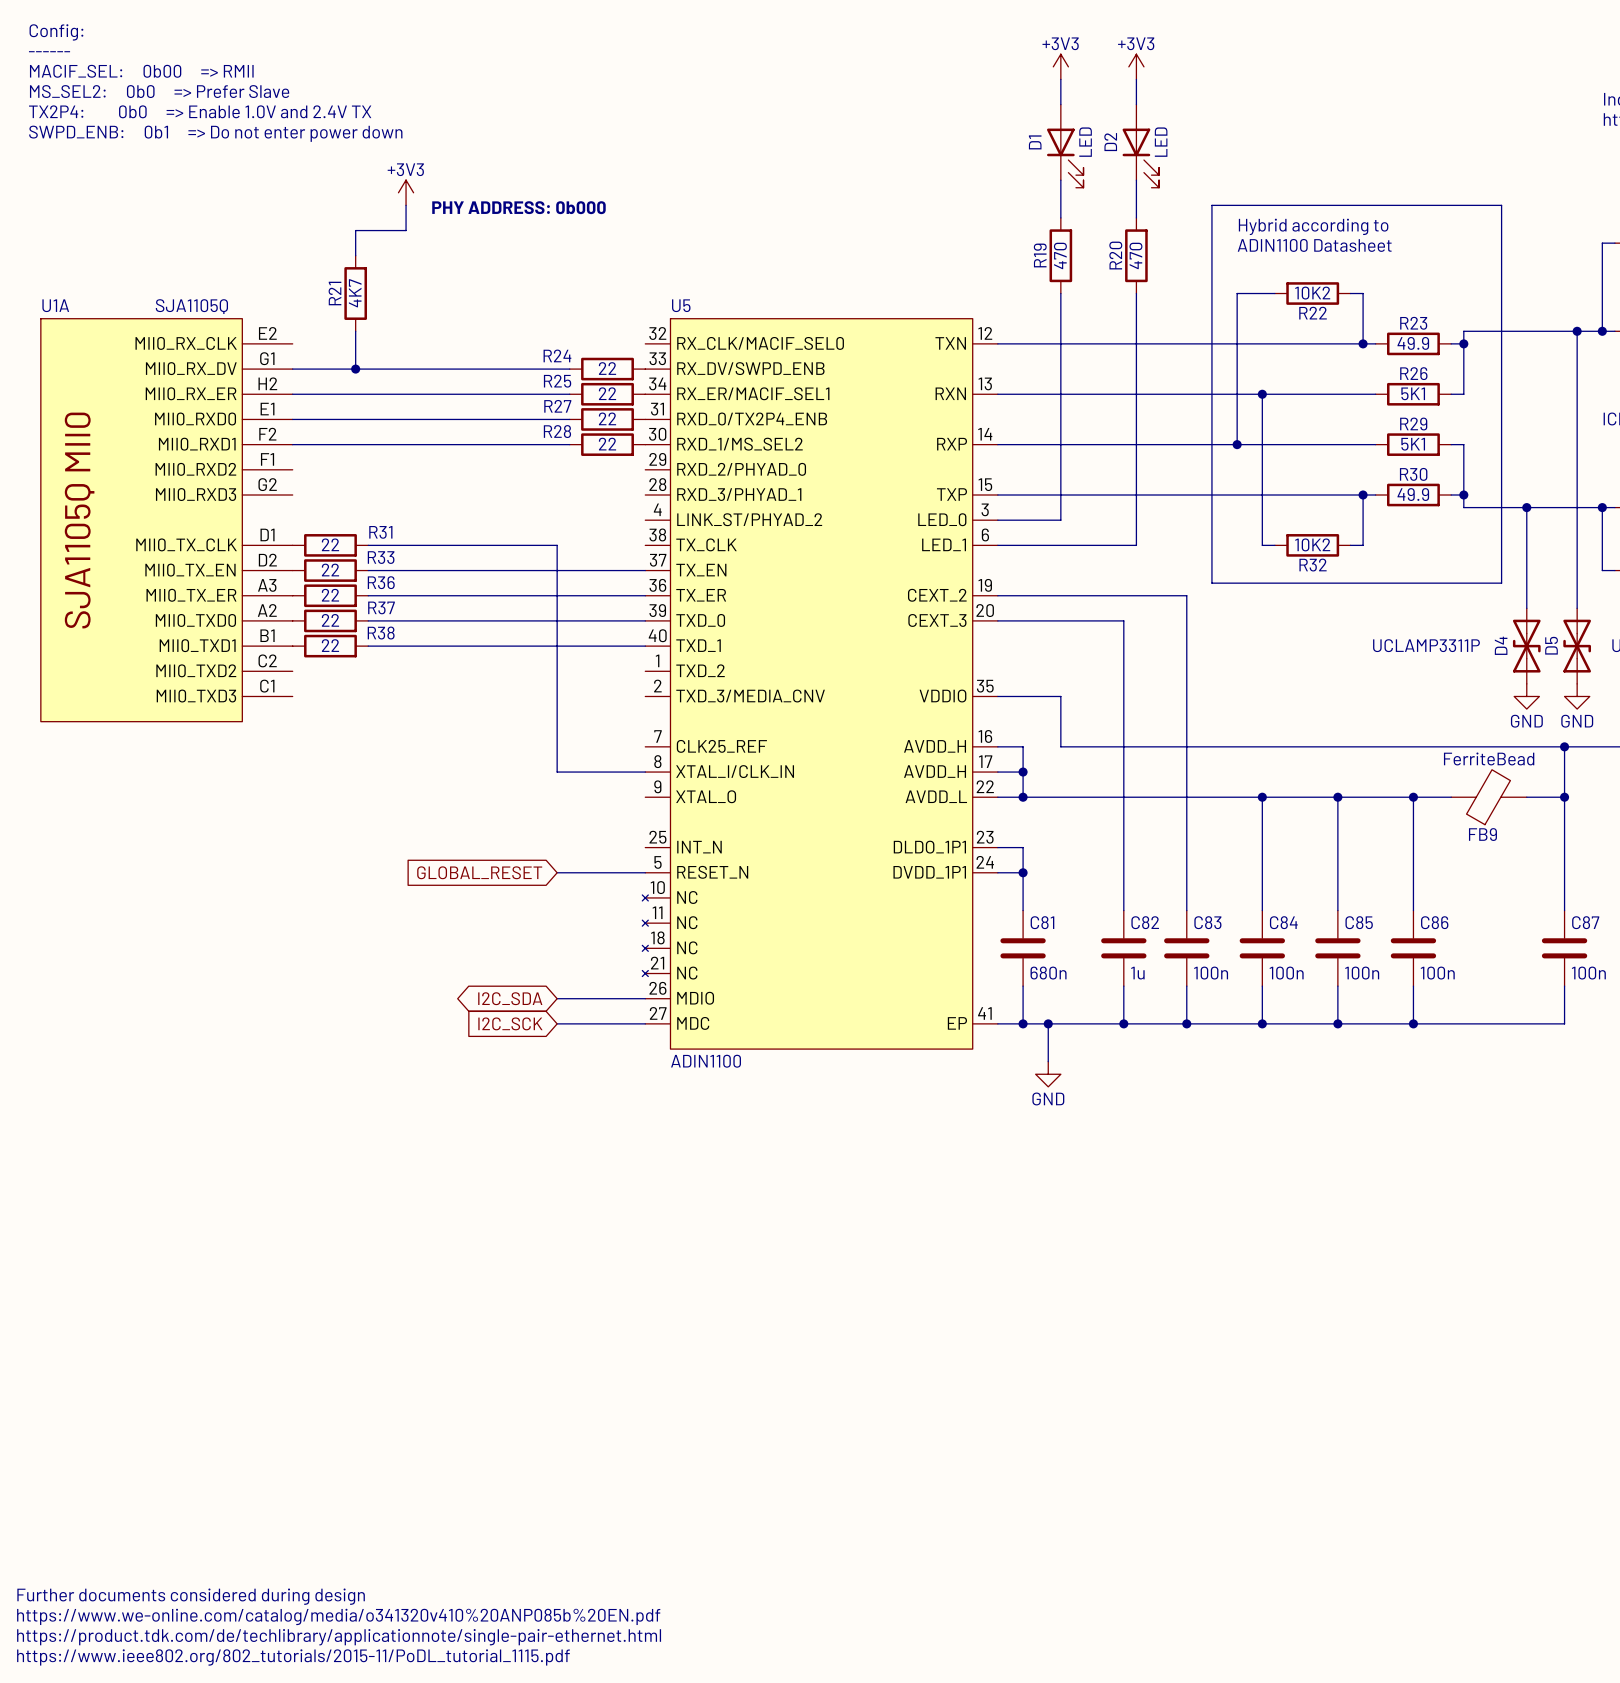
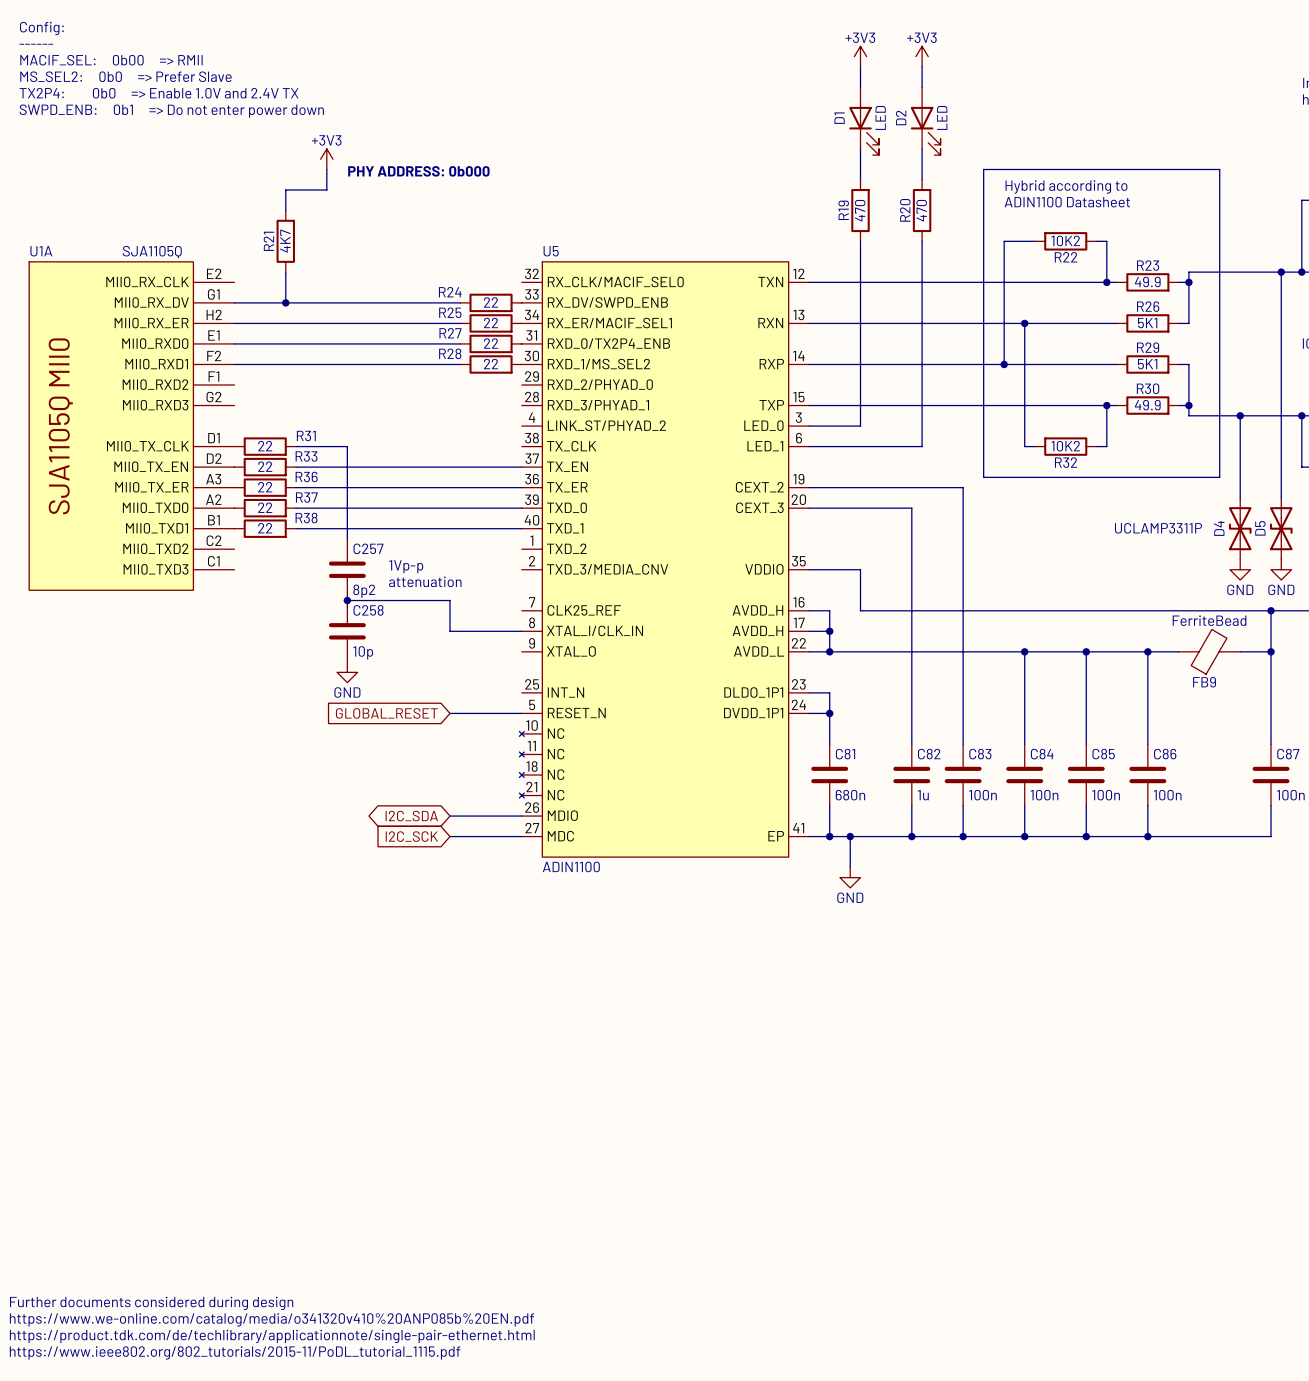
wire: (431, 545) (557, 545) (557, 734) -> (347, 446) (347, 538)
text: none -> 1Vp-p (406, 566)
C257: none -> 8p2 (347, 569)
text: none -> attenuation (425, 581)
wire: none -> (347, 600) (449, 600)
junction: none -> (347, 600)
C258: none -> 10p (347, 631)
power symbol: none -> GND (347, 672)

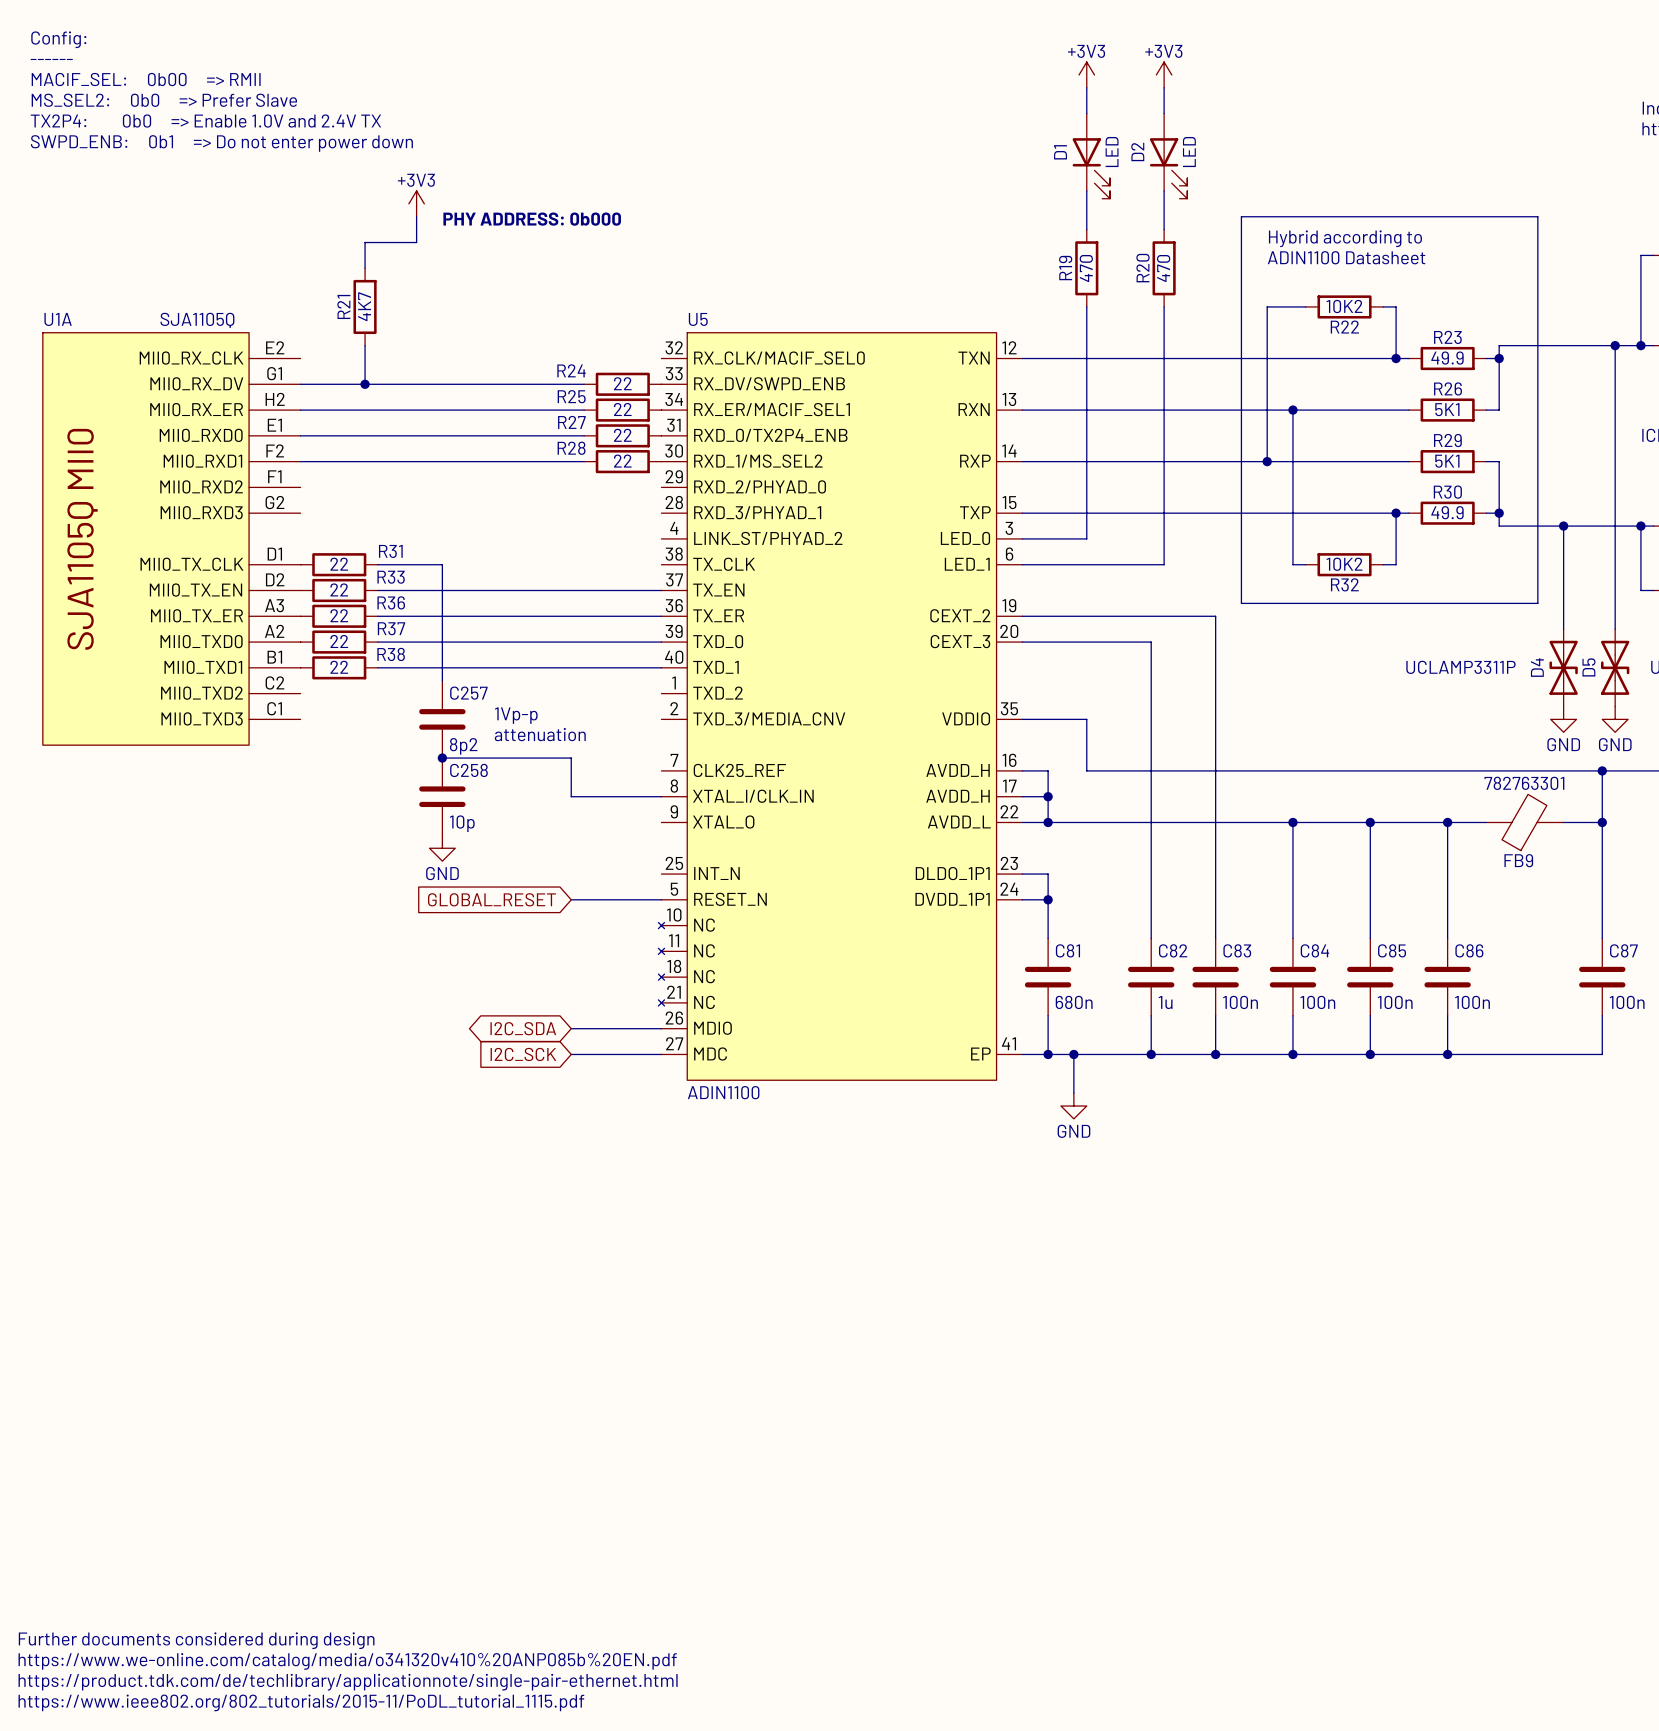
FB9 value: FerriteBead (1209, 620) -> 782763301 (1524, 783)

